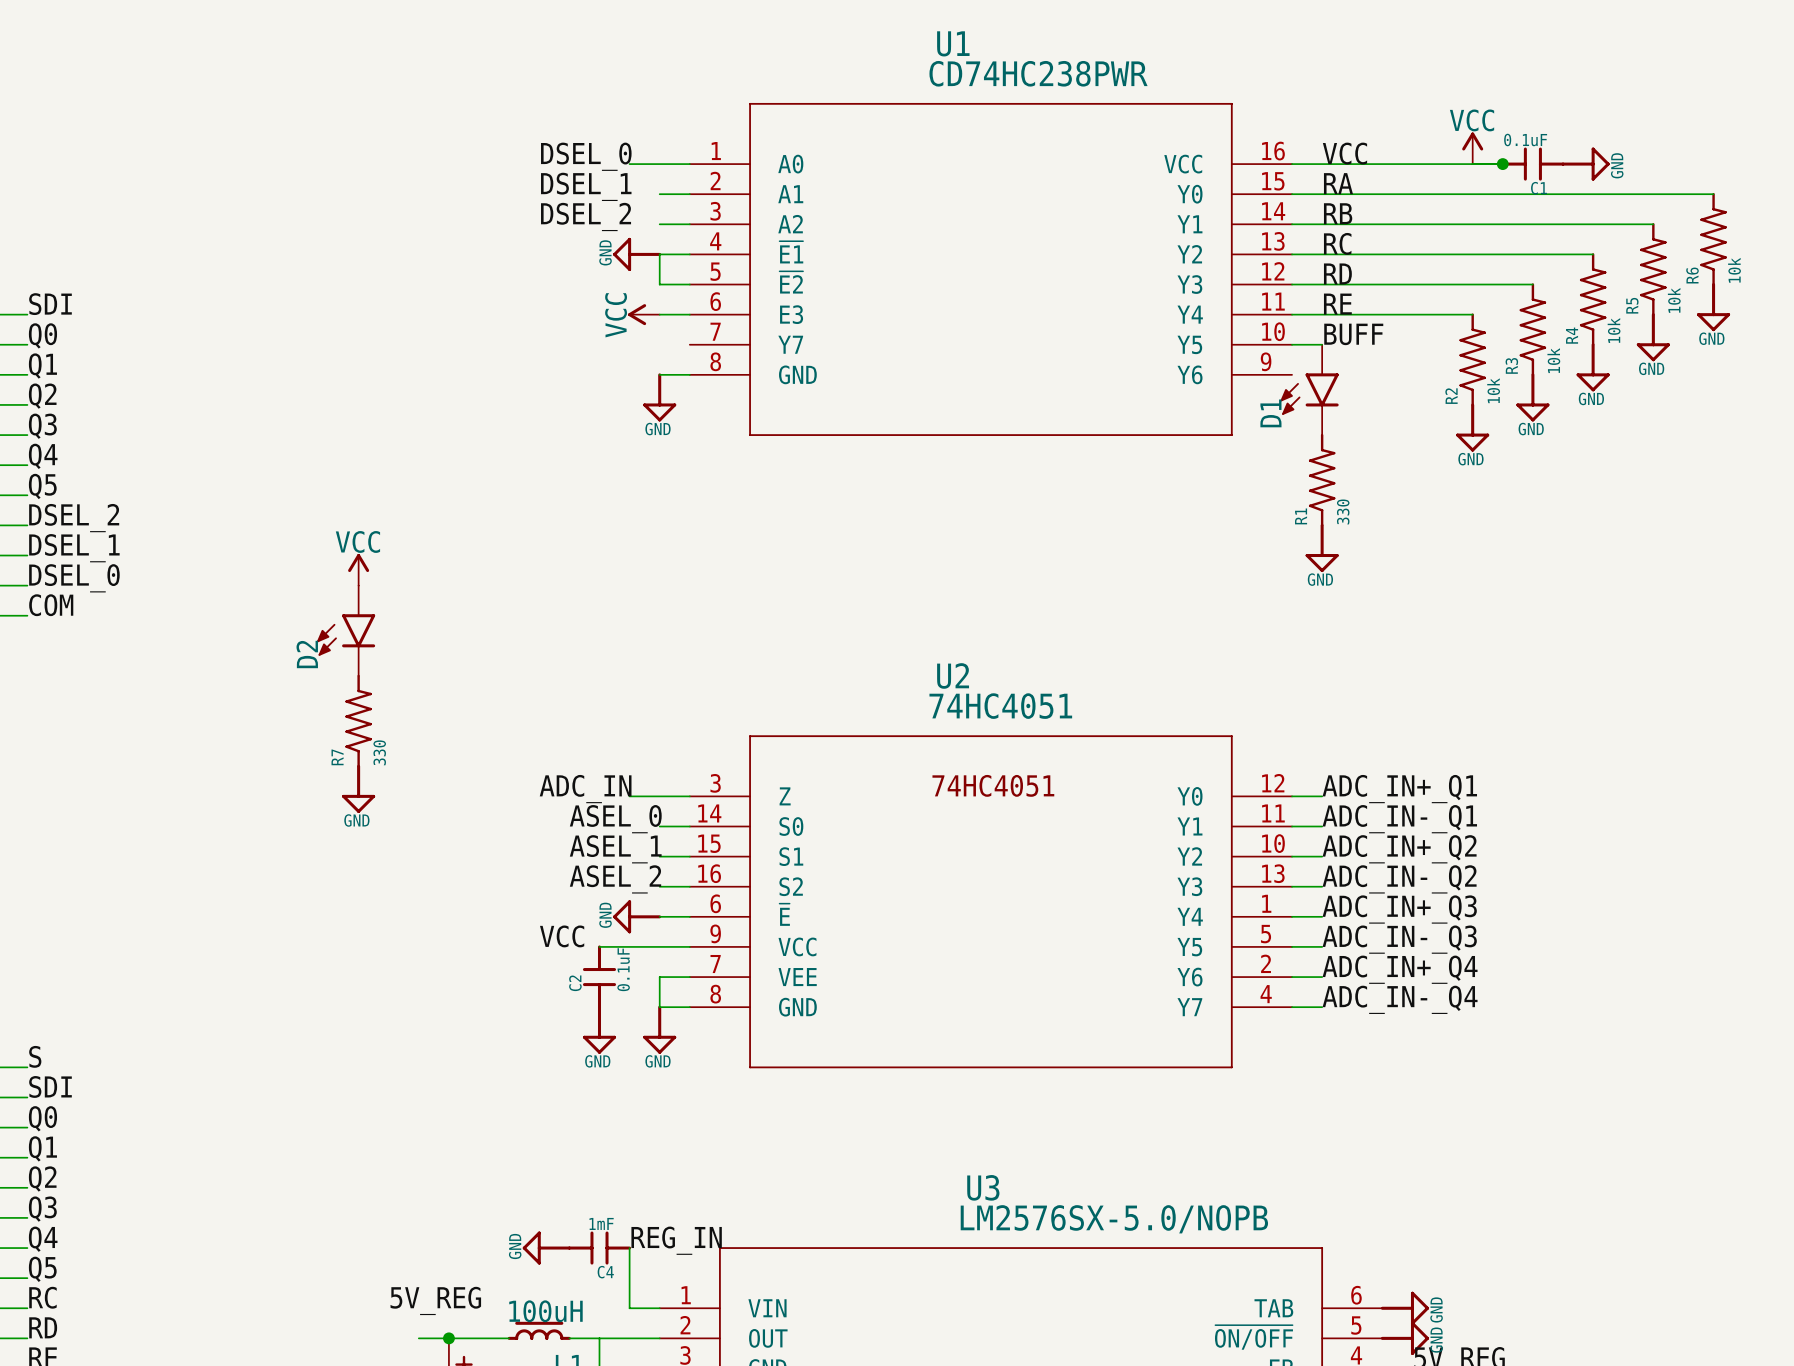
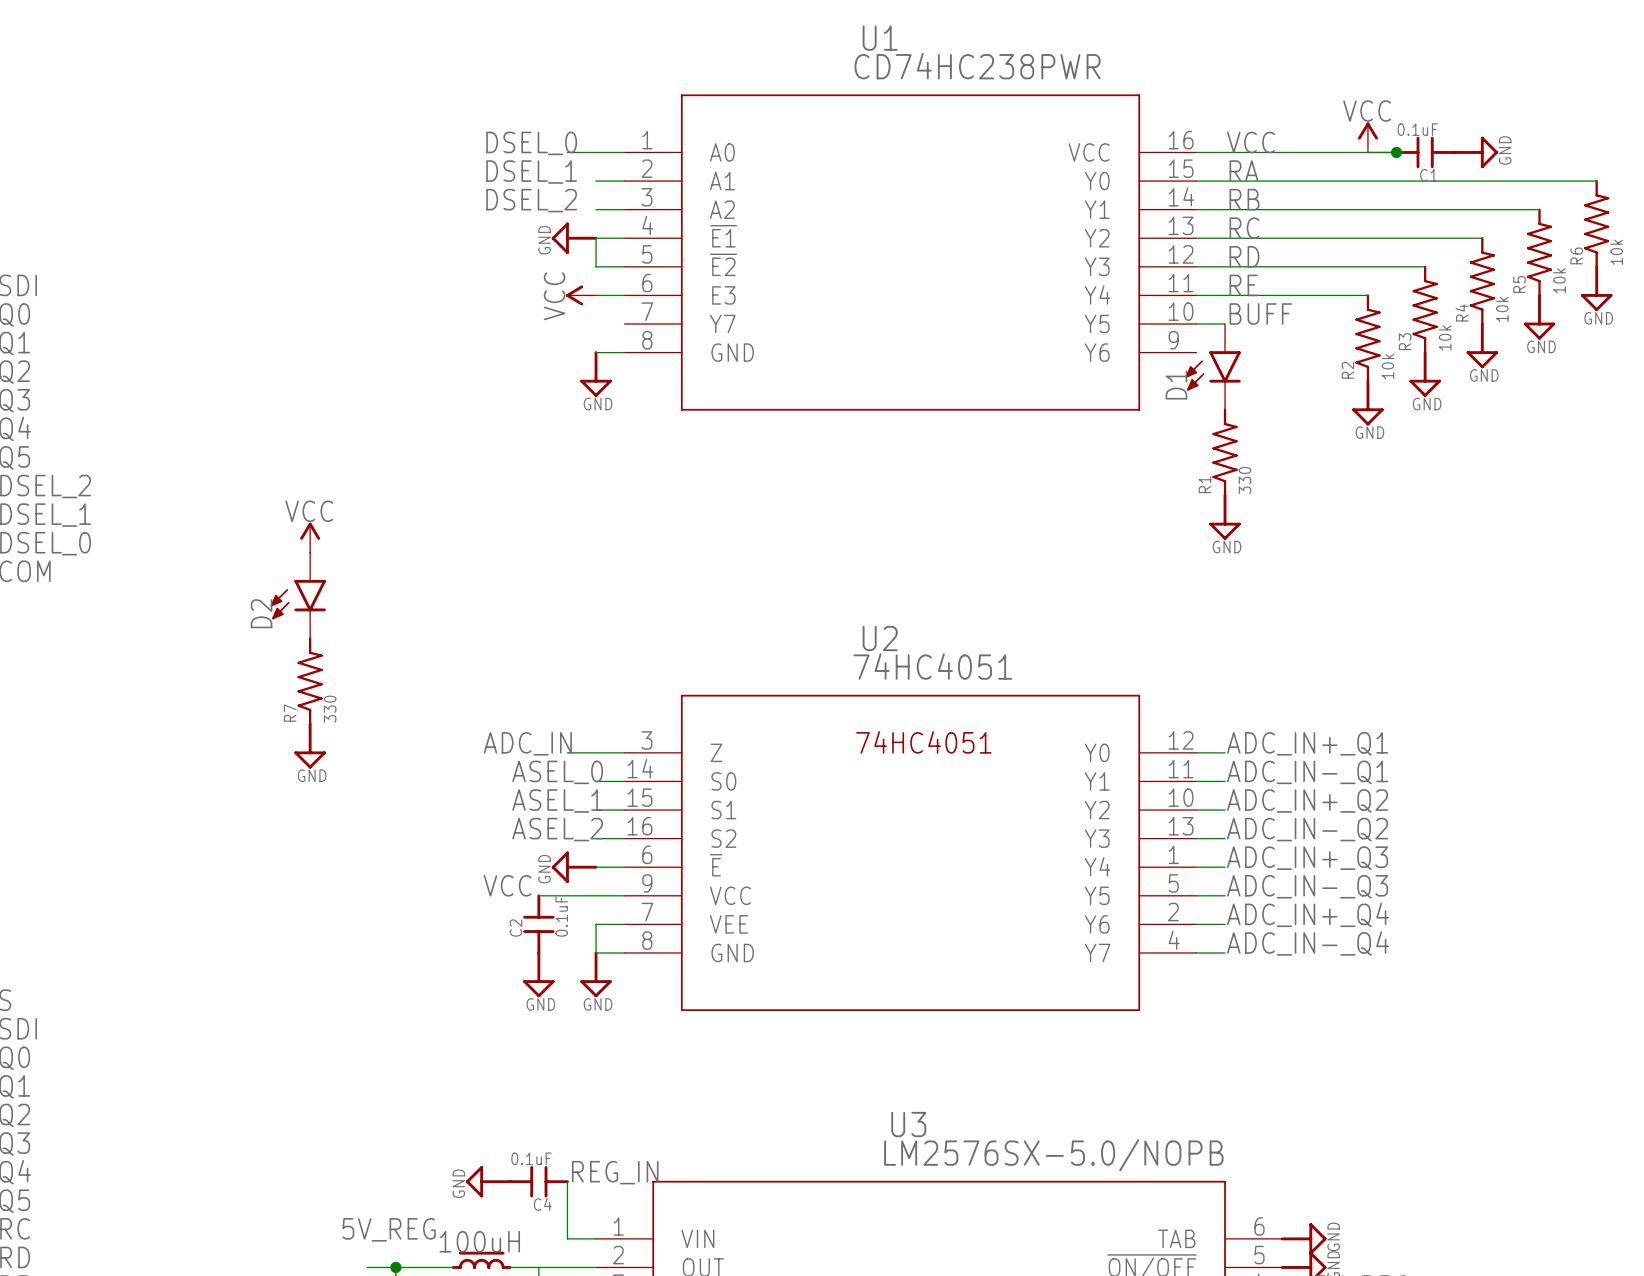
C4 value: 1mF (601, 1223) -> 0.1uF (531, 1158)

